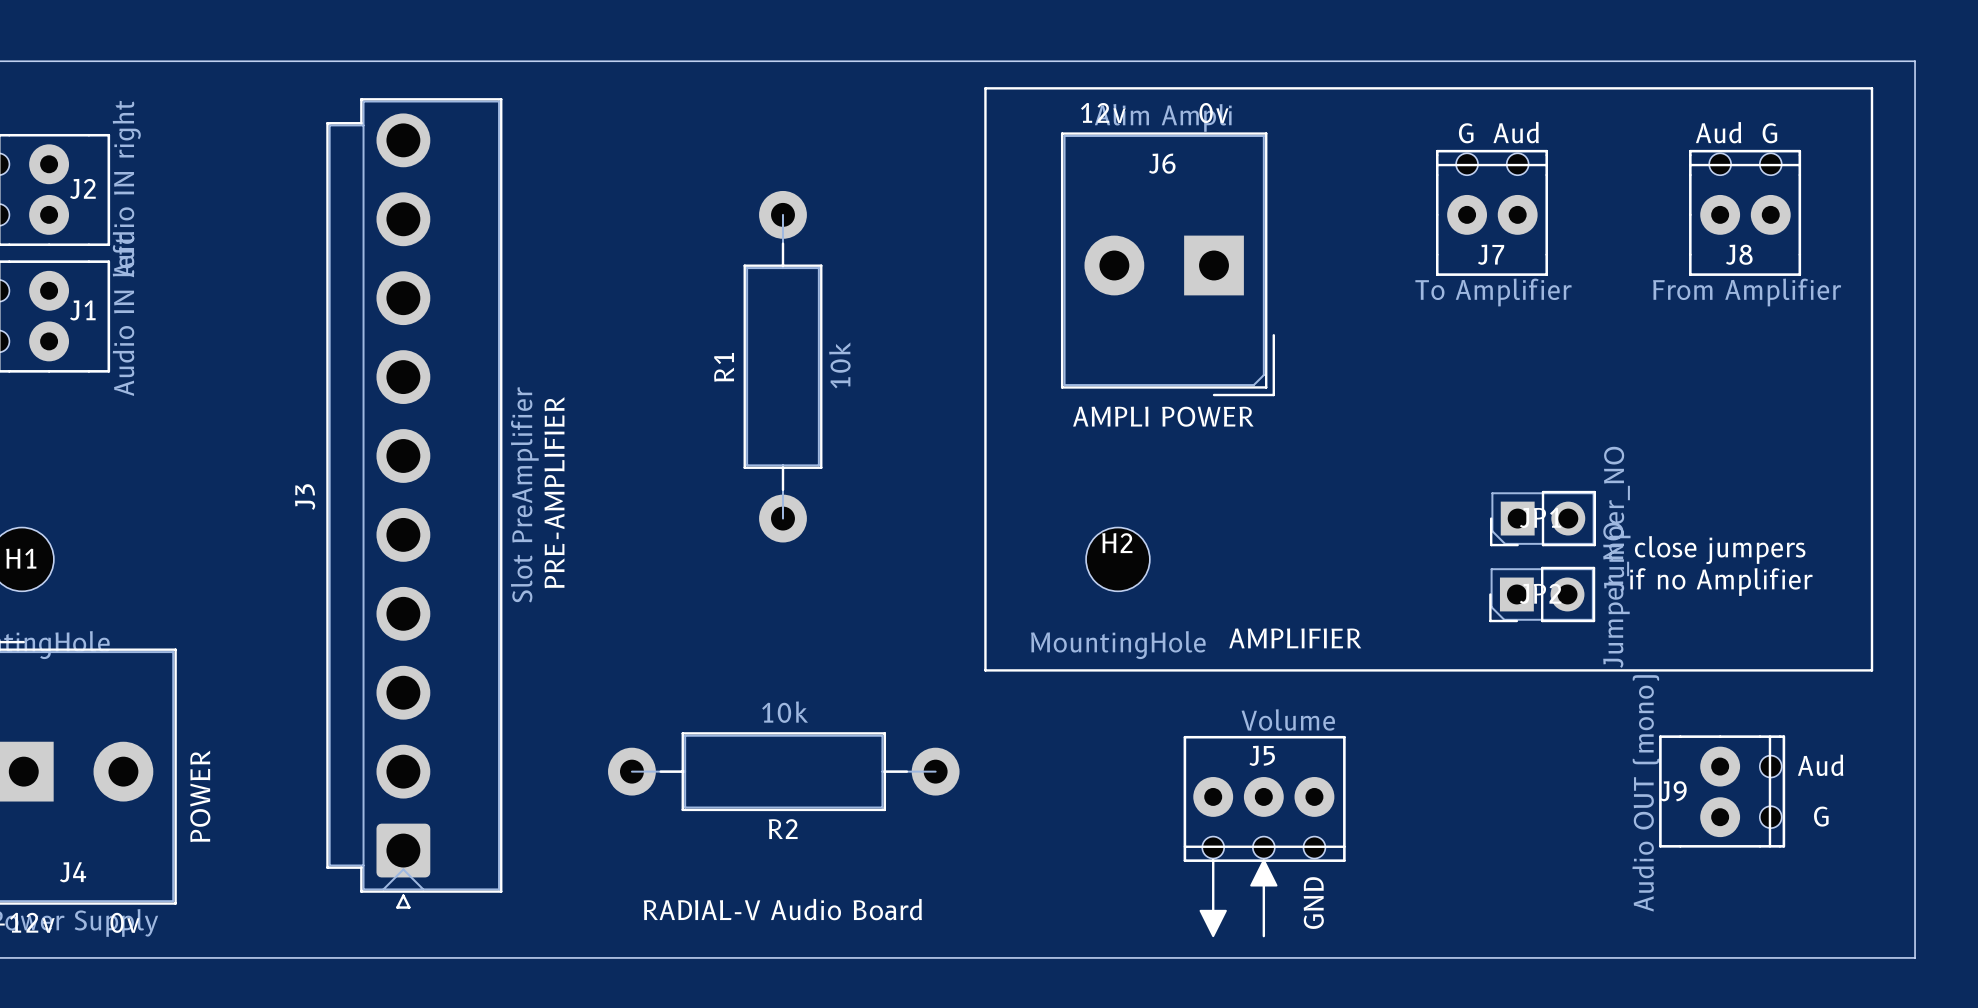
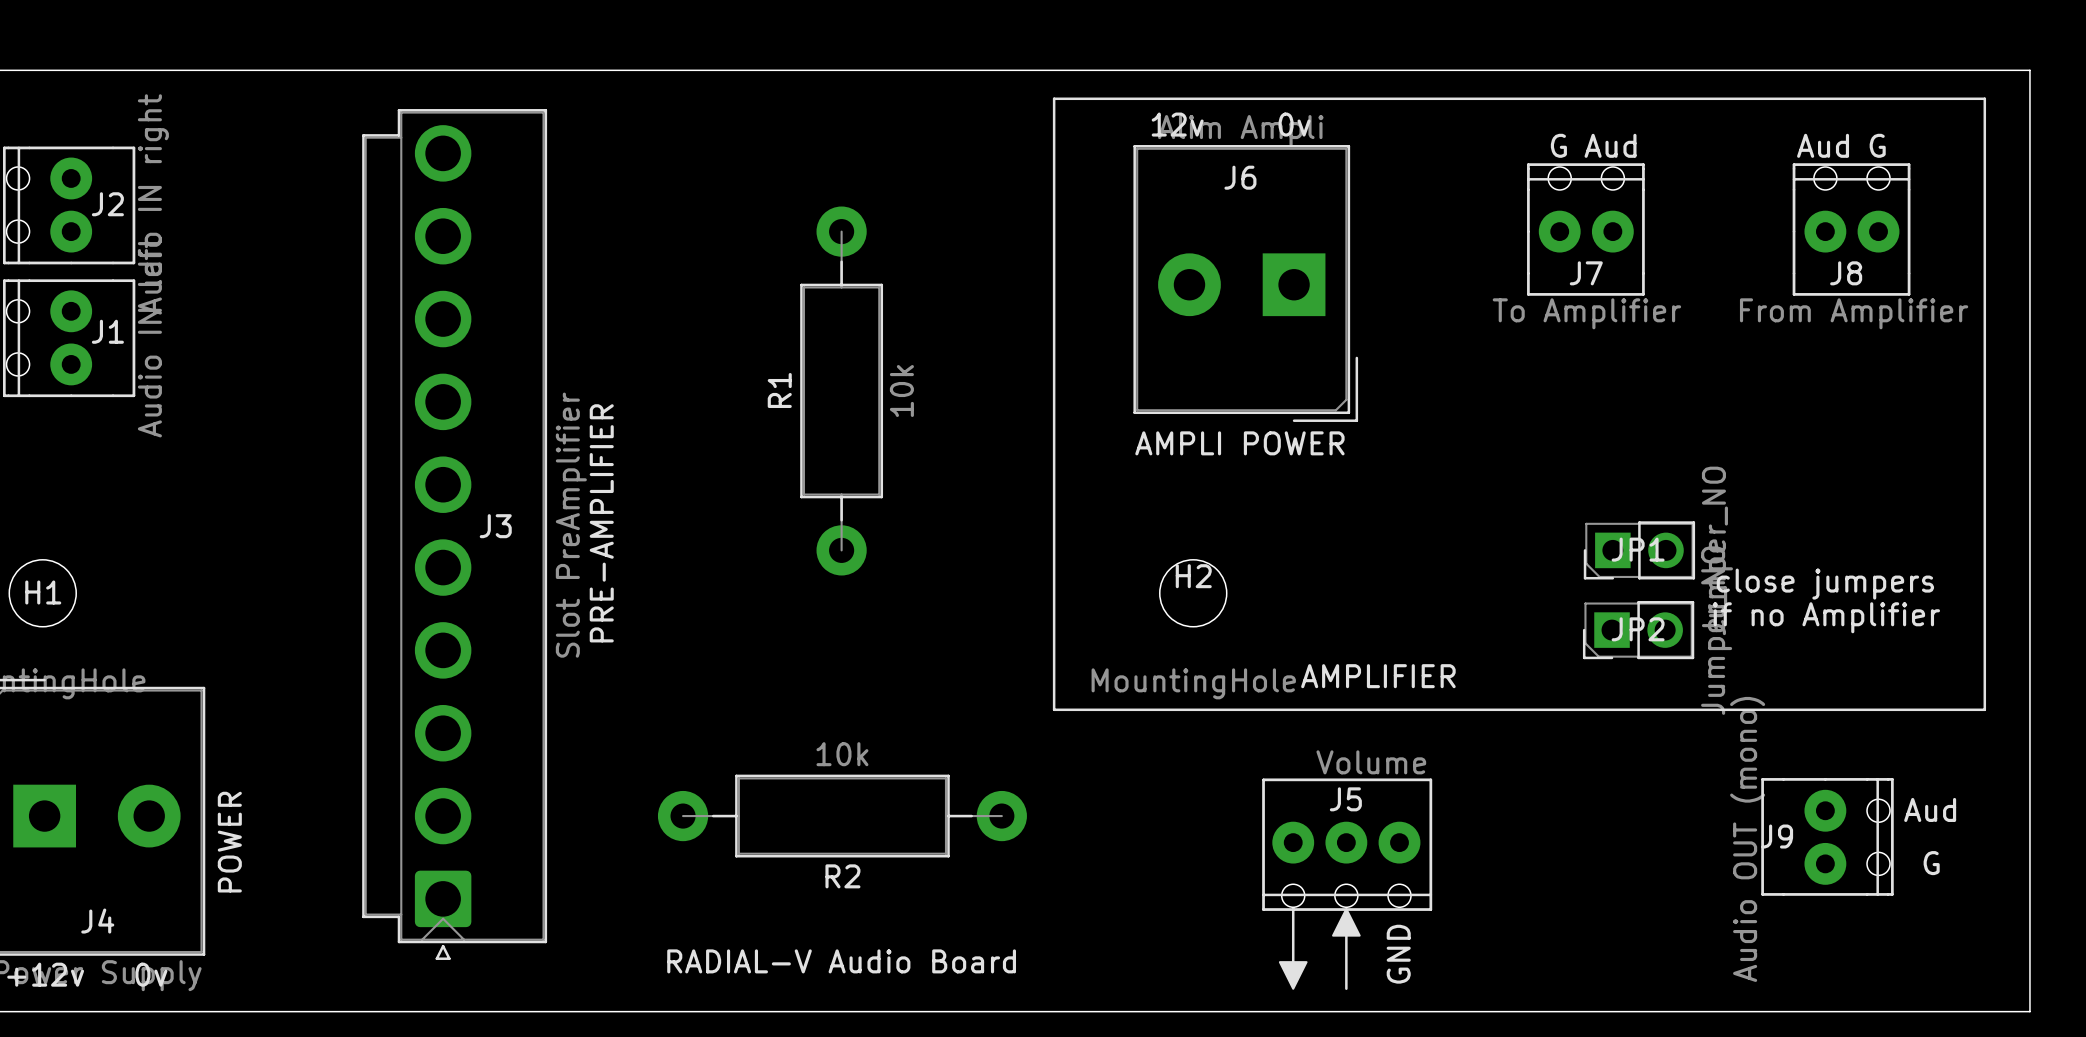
J3 name rotation: 0° (305, 497) -> 90° clockwise (495, 526)
J3 name position: J3 (305, 497) -> J3 (495, 526)

